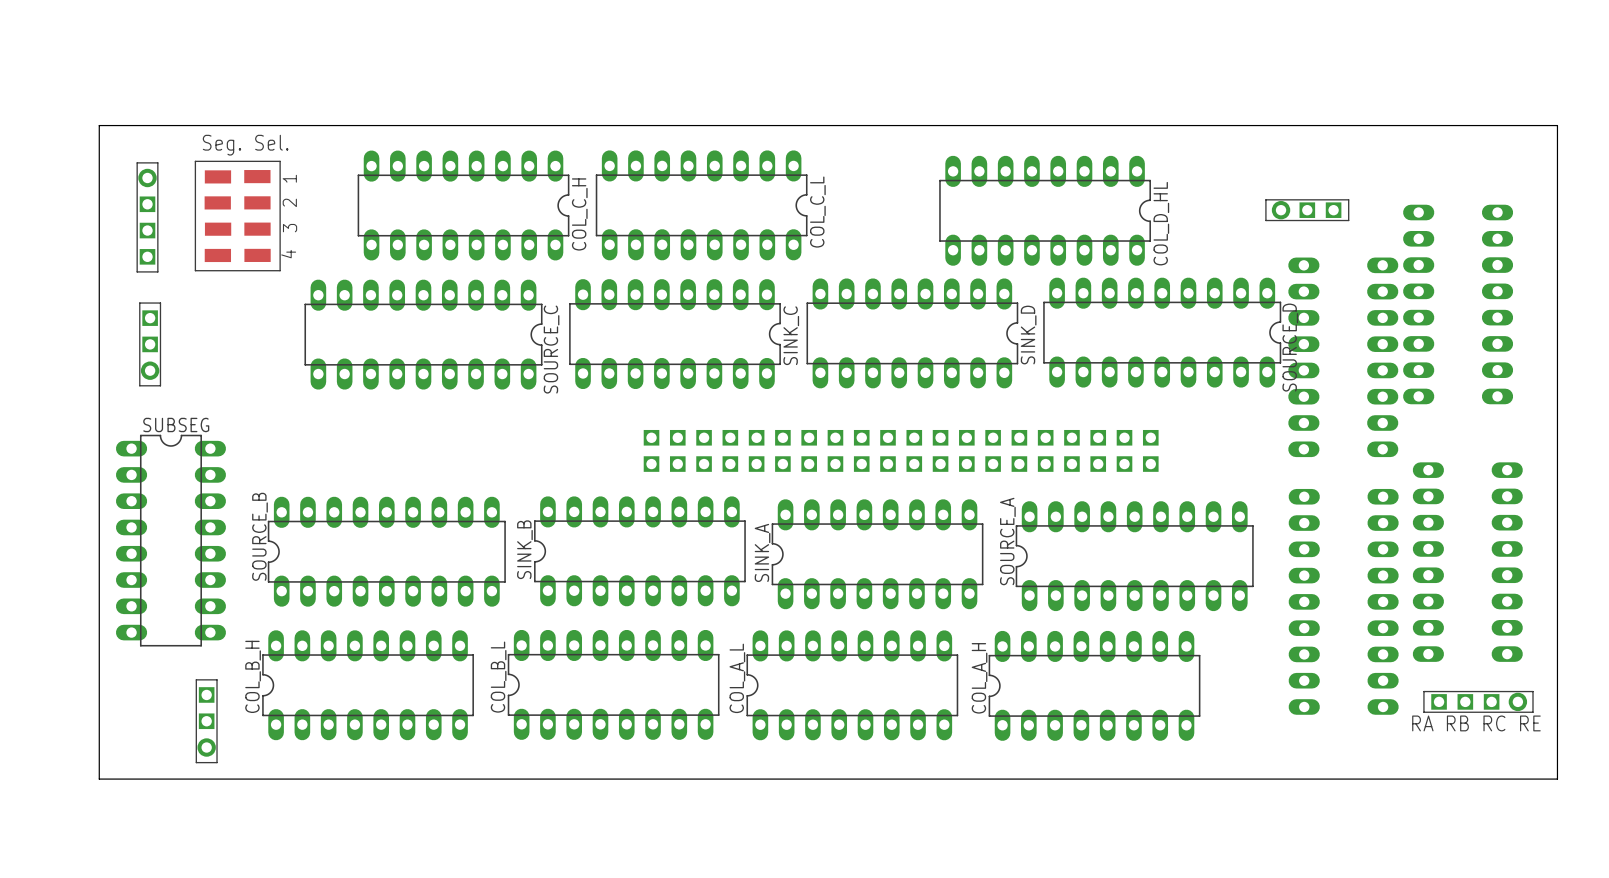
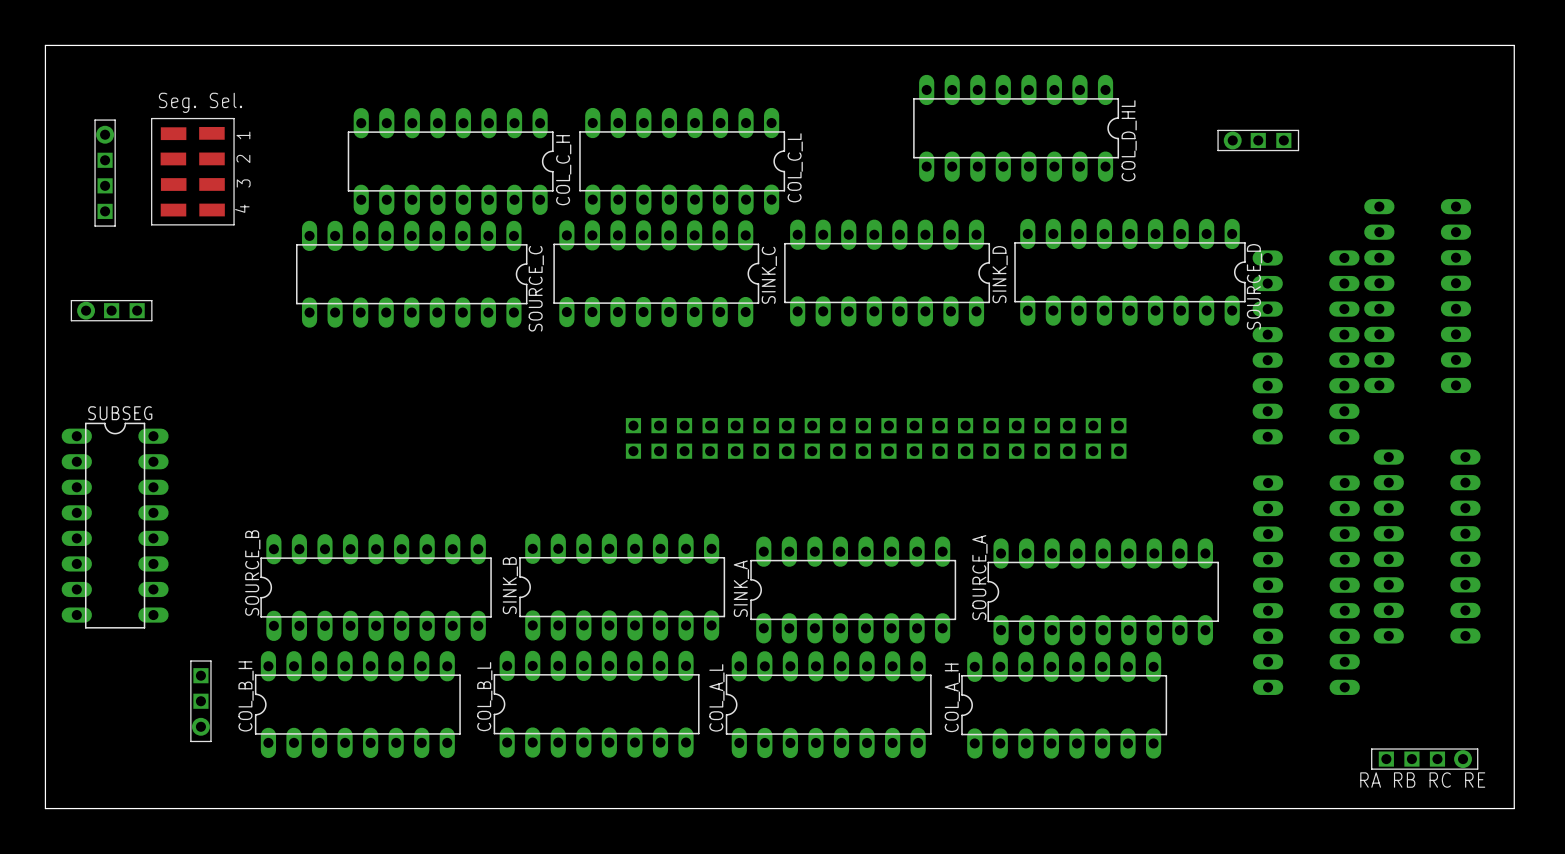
board edge: (1557, 125) (99, 125) (99, 779) (1557, 779) -> (1514, 122) (1514, 45) (45, 45) (45, 808) (1514, 808) (1514, 757)
text position: Seg. Sel. (245, 145) -> Seg. Sel. (200, 102)
COL_C_H position: (463, 205) -> (450, 161)
COL_C_L position: (701, 205) -> (682, 161)
COL_D_HL position: (1045, 210) -> (1016, 128)
part position: (1307, 210) -> (1258, 140)
part position: (237, 216) -> (192, 171)
part position: (147, 217) -> (105, 173)
SOURCE_D position: (1162, 332) -> (1129, 272)
SINK_D position: (912, 333) -> (887, 273)
SOURCE_C position: (423, 334) -> (411, 274)
SINK_C position: (675, 334) -> (656, 273)
part rotation: 0° (150, 344) -> 90° clockwise (111, 310)
SUBSEG position: (170, 540) -> (115, 525)
SOURCE_B position: (386, 551) -> (376, 587)
SINK_B position: (639, 551) -> (622, 587)
SINK_A position: (877, 554) -> (853, 589)
SOURCE_A position: (1134, 556) -> (1103, 591)
COL_B_L position: (613, 684) -> (596, 704)
COL_B_H position: (368, 685) -> (357, 704)
COL_A_L position: (852, 685) -> (828, 704)
COL_A_H position: (1094, 685) -> (1064, 705)
part position: (1478, 701) -> (1424, 759)
text position: RA RB RC RE (1476, 723) -> RA RB RC RE (1422, 780)

